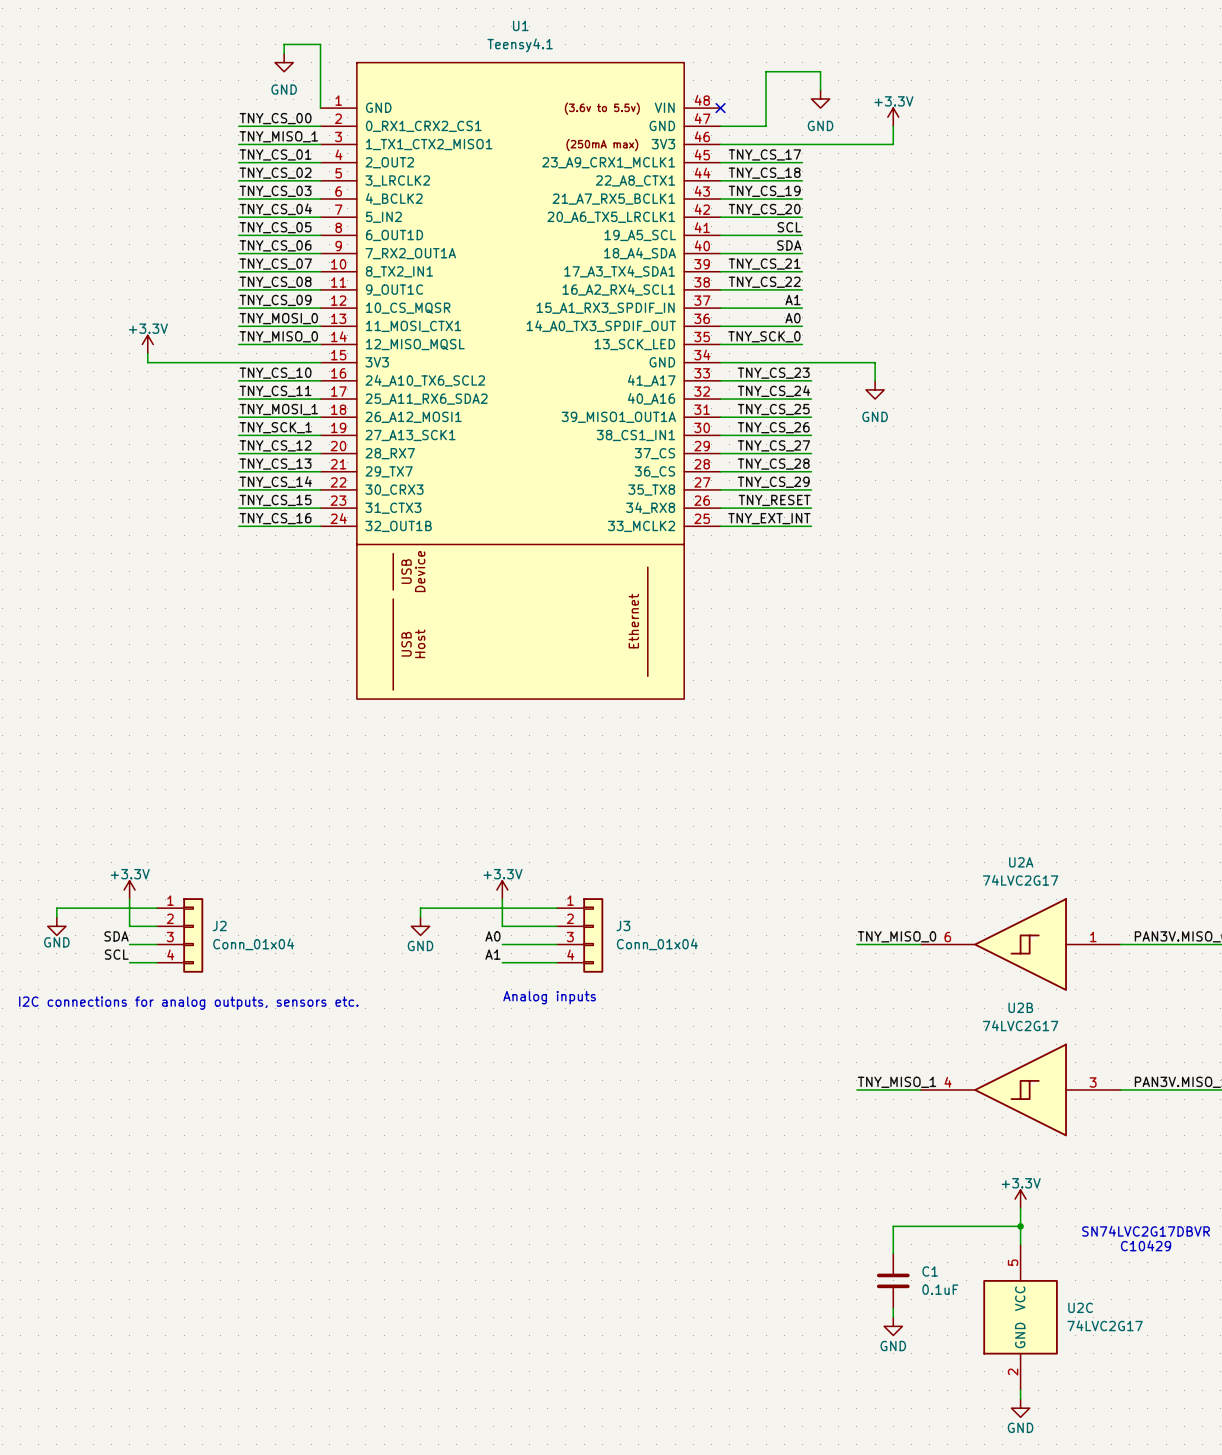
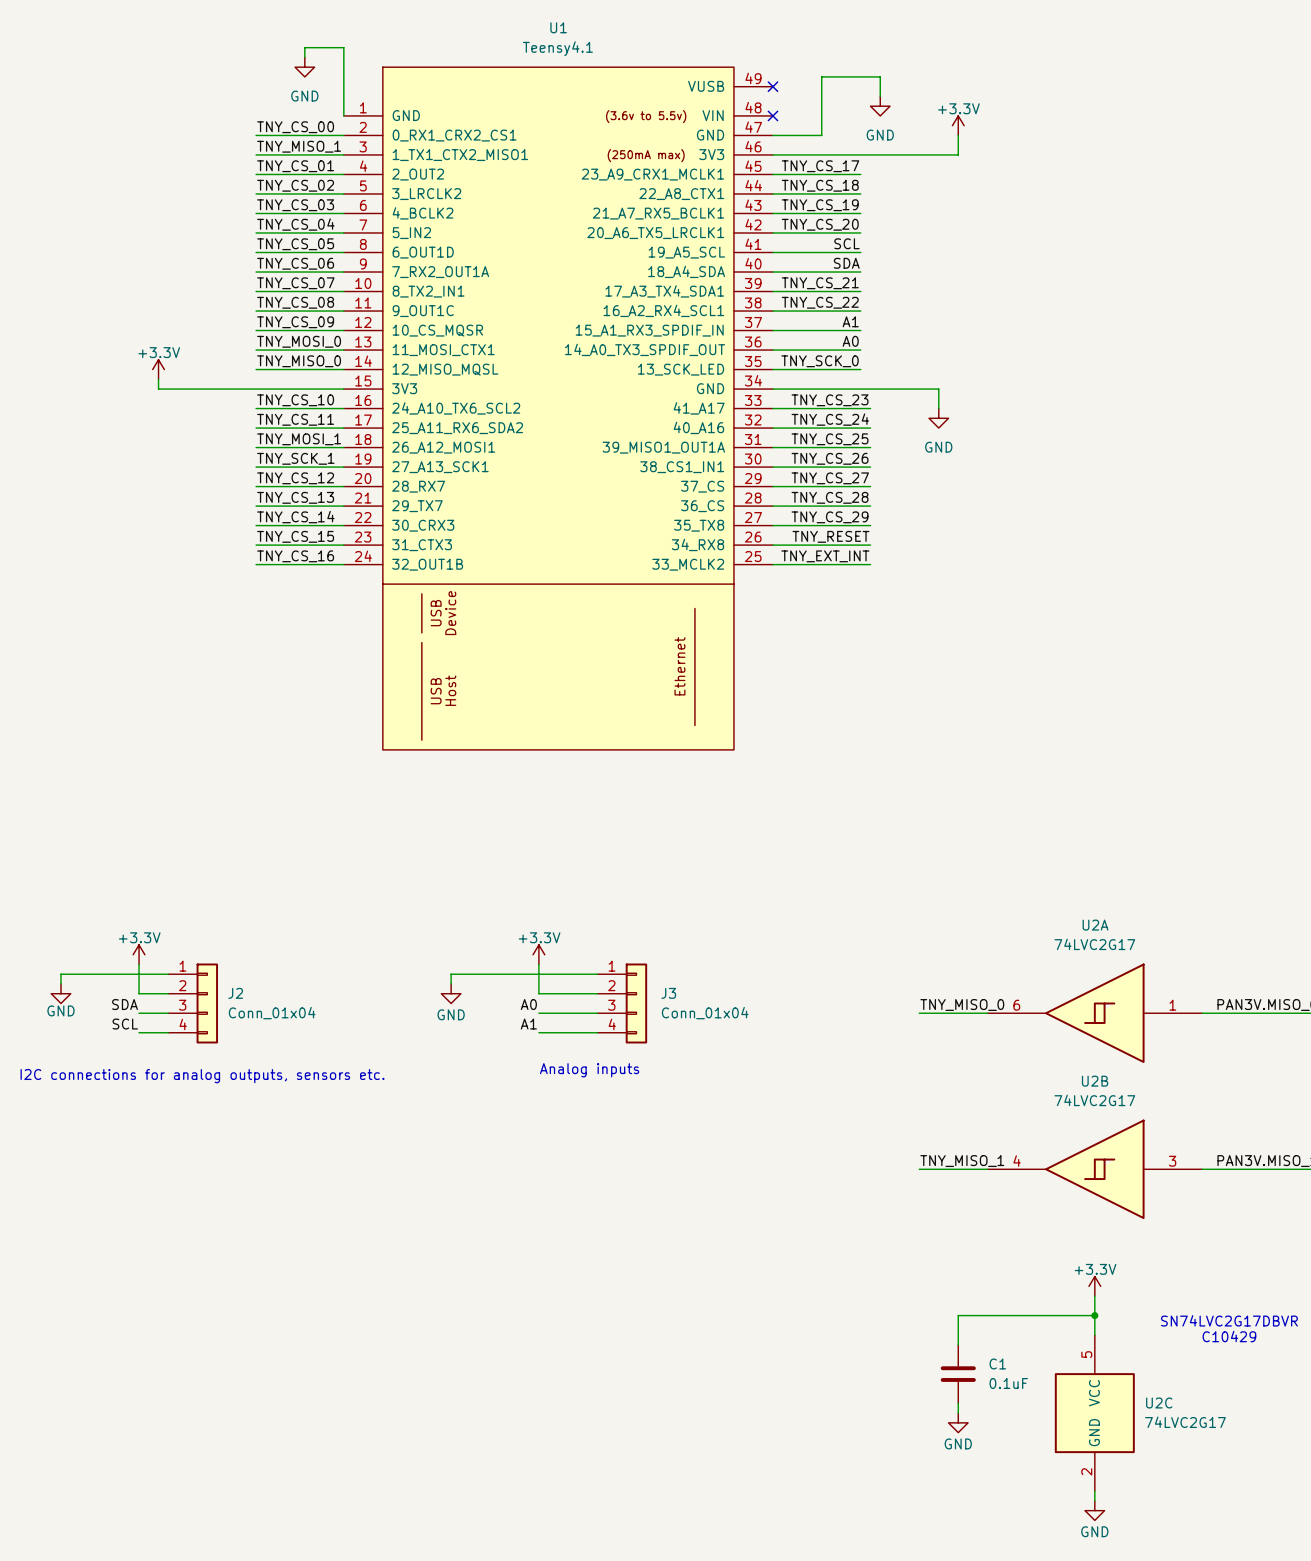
U1 symbol: [320, 62, 721, 700] -> [343, 67, 773, 750]
no-connect mark: none -> (772, 86)

